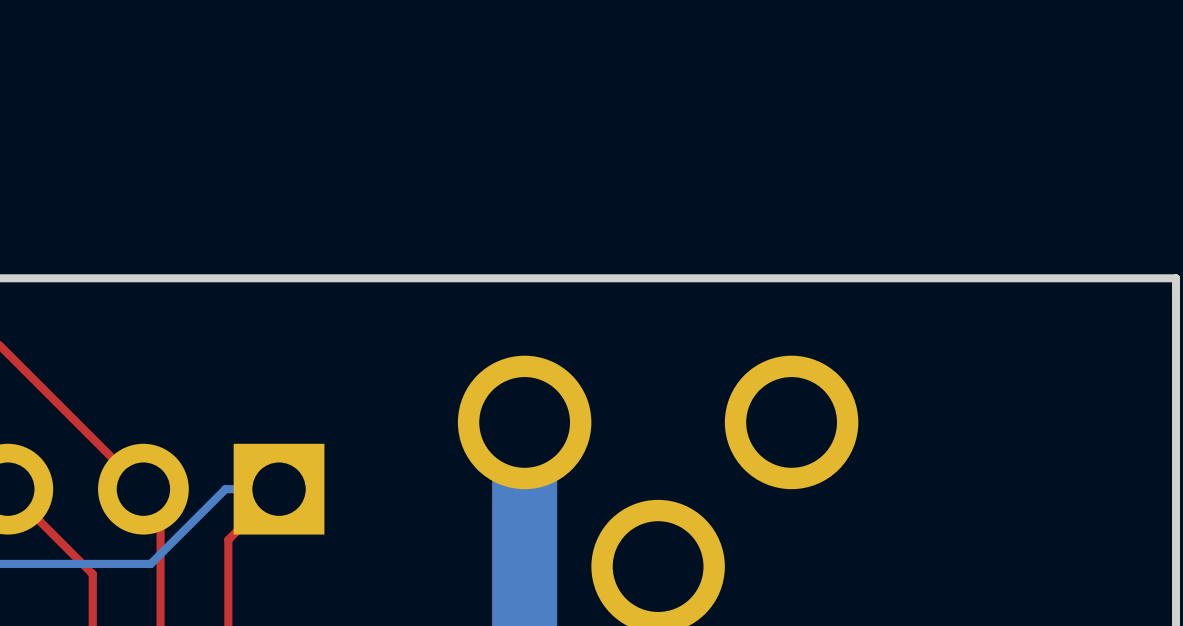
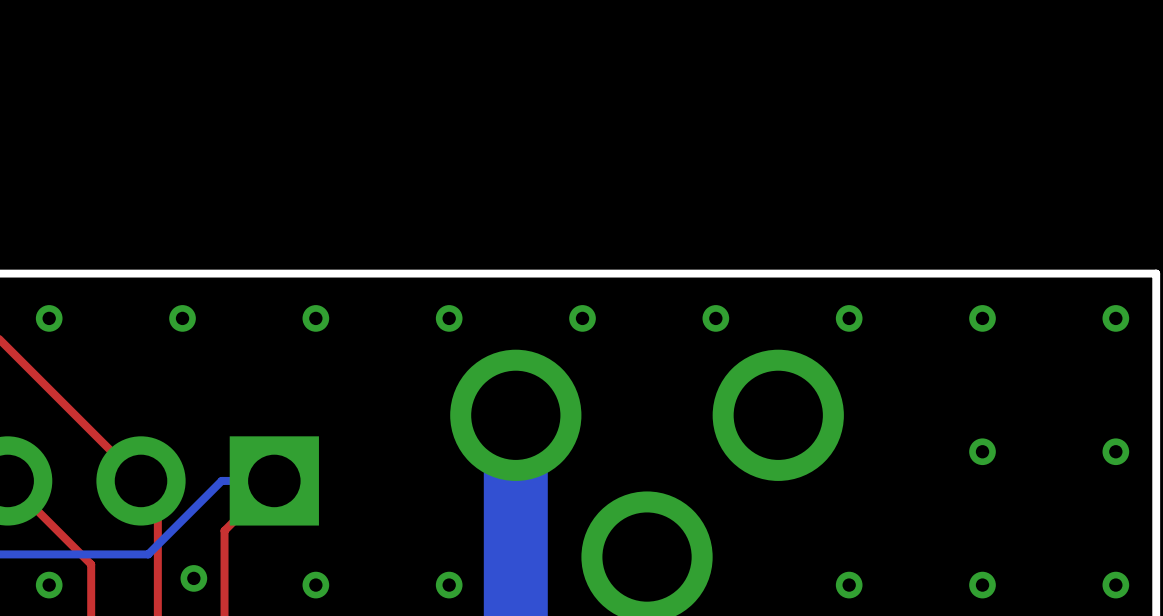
part: none -> (49, 318)
part: none -> (182, 318)
part: none -> (315, 318)
part: none -> (449, 318)
part: none -> (582, 318)
part: none -> (715, 318)
part: none -> (849, 318)
part: none -> (982, 318)
part: none -> (1115, 318)
part: none -> (982, 451)
part: none -> (1115, 451)
part: none -> (193, 578)
part: none -> (49, 585)
part: none -> (315, 585)
part: none -> (449, 585)
part: none -> (849, 585)
part: none -> (982, 585)
part: none -> (1115, 585)

